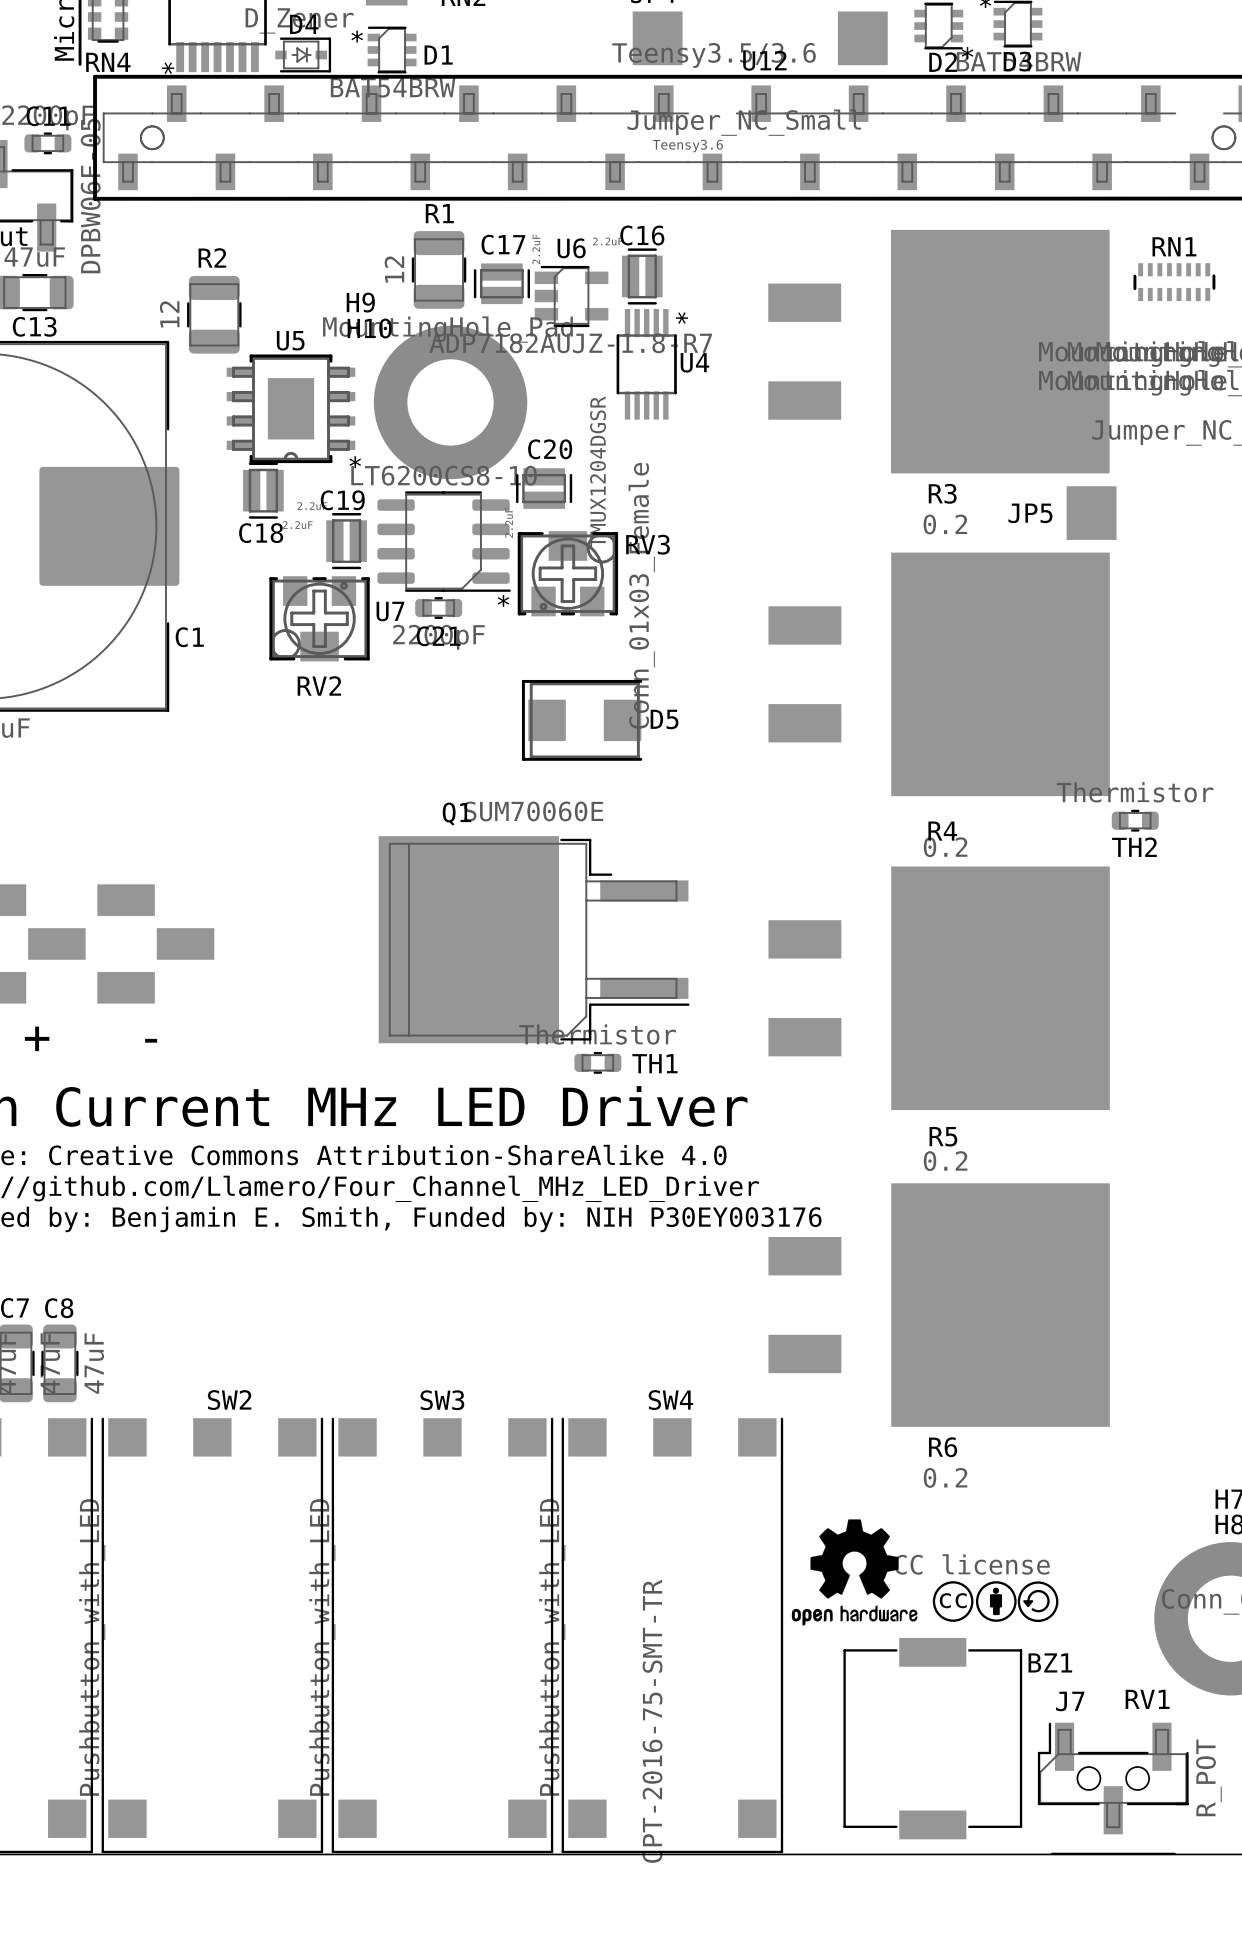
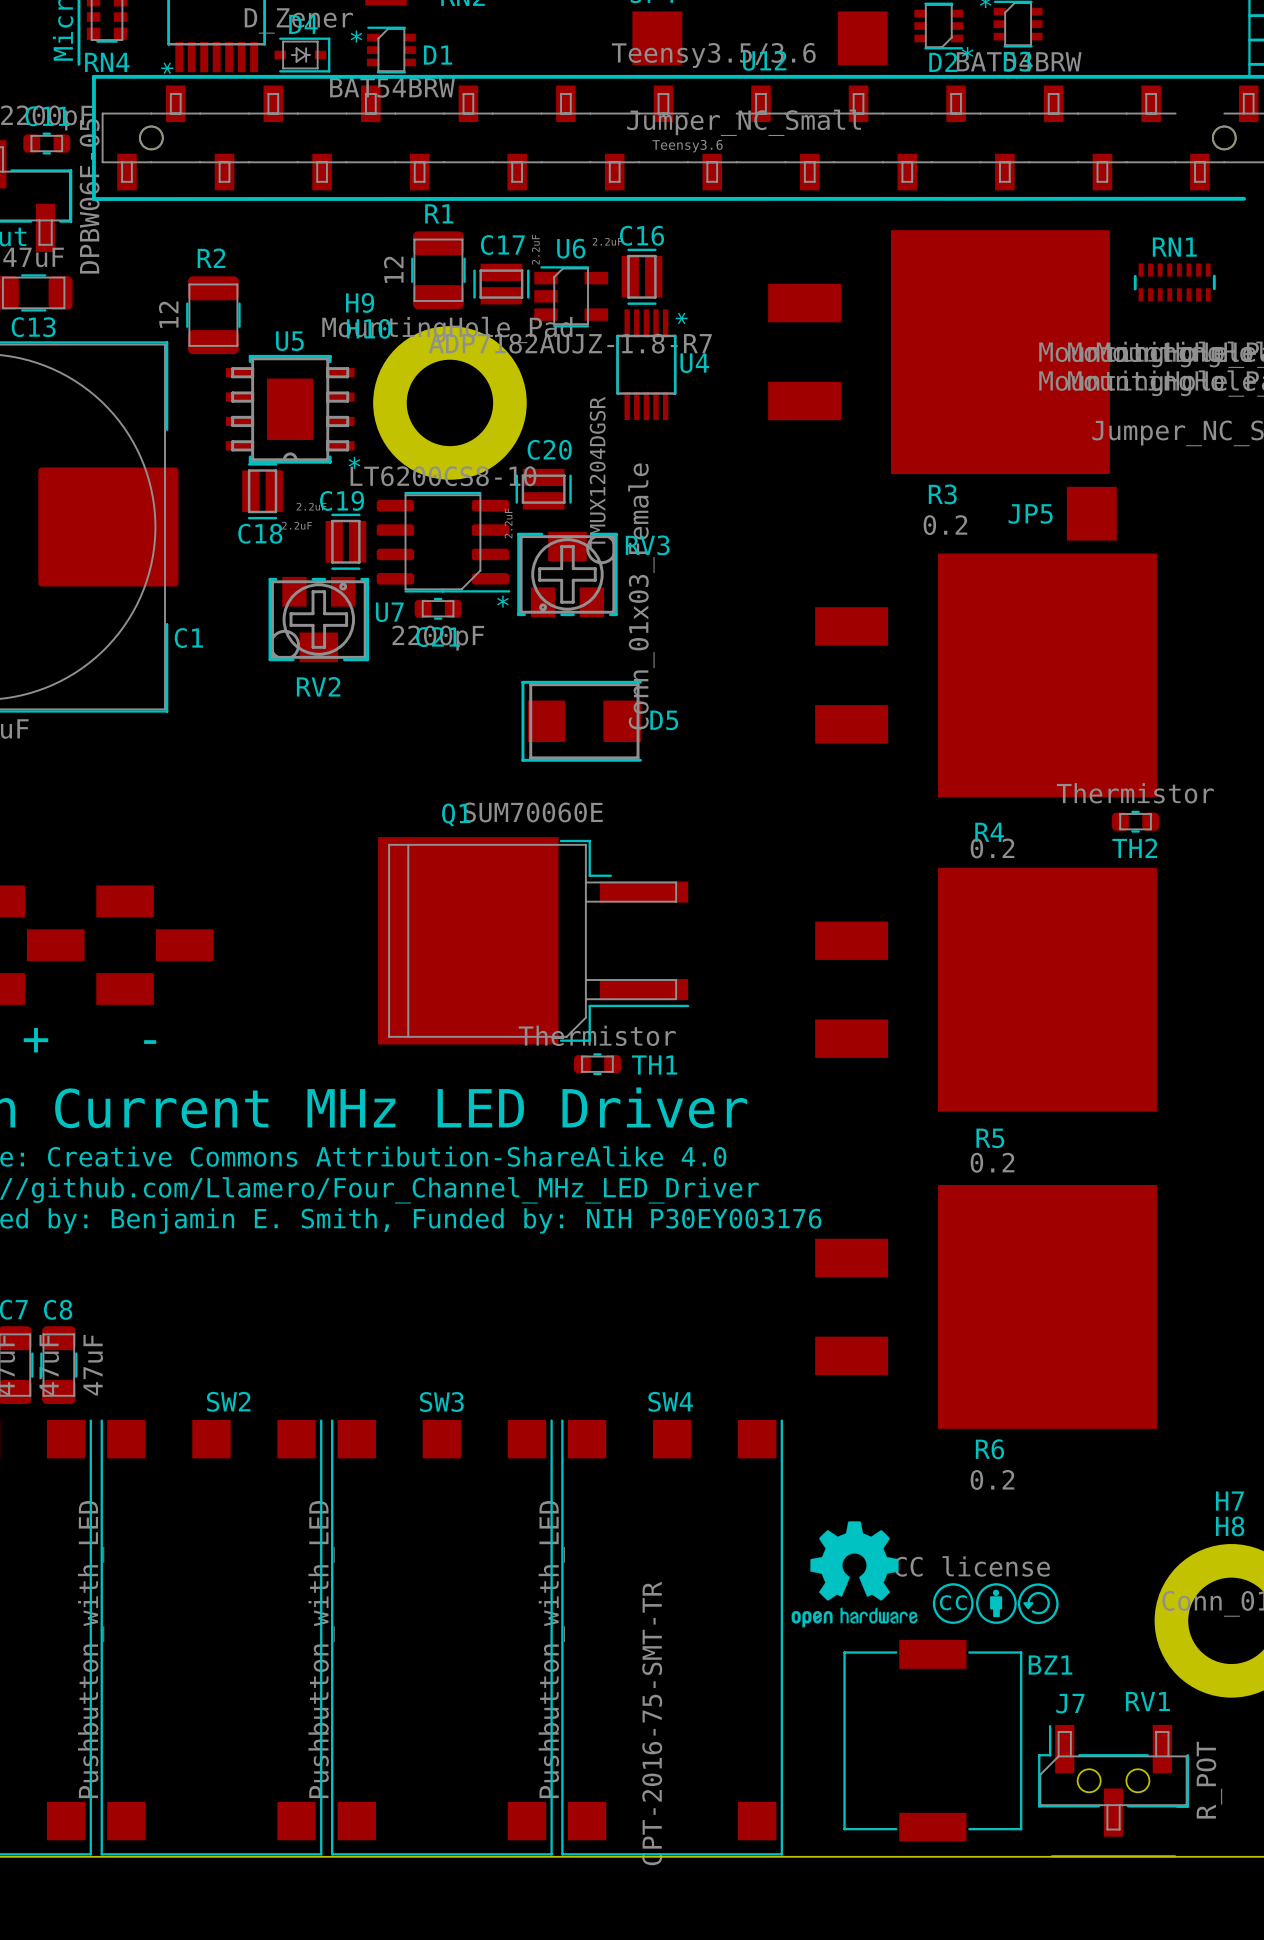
R4 position: (939, 674) -> (986, 675)
R5 position: (939, 988) -> (986, 989)
R6 position: (939, 1305) -> (986, 1306)

